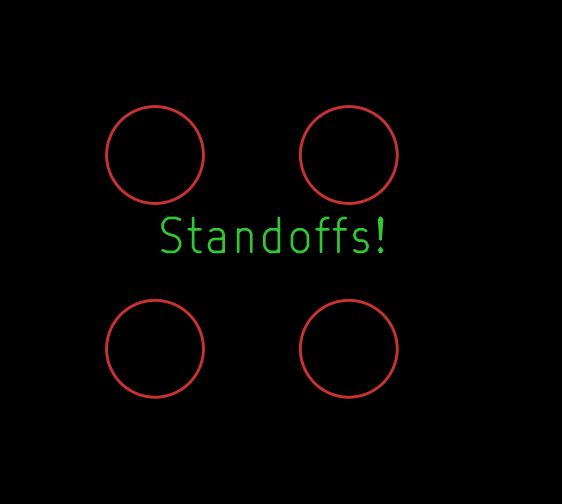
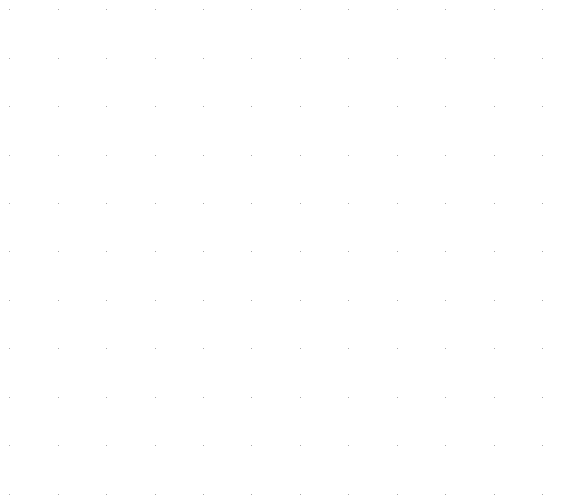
part: (155, 155) -> none
part: (348, 155) -> none
text: Standoffs! (272, 234) -> none
part: (155, 348) -> none
part: (348, 348) -> none

